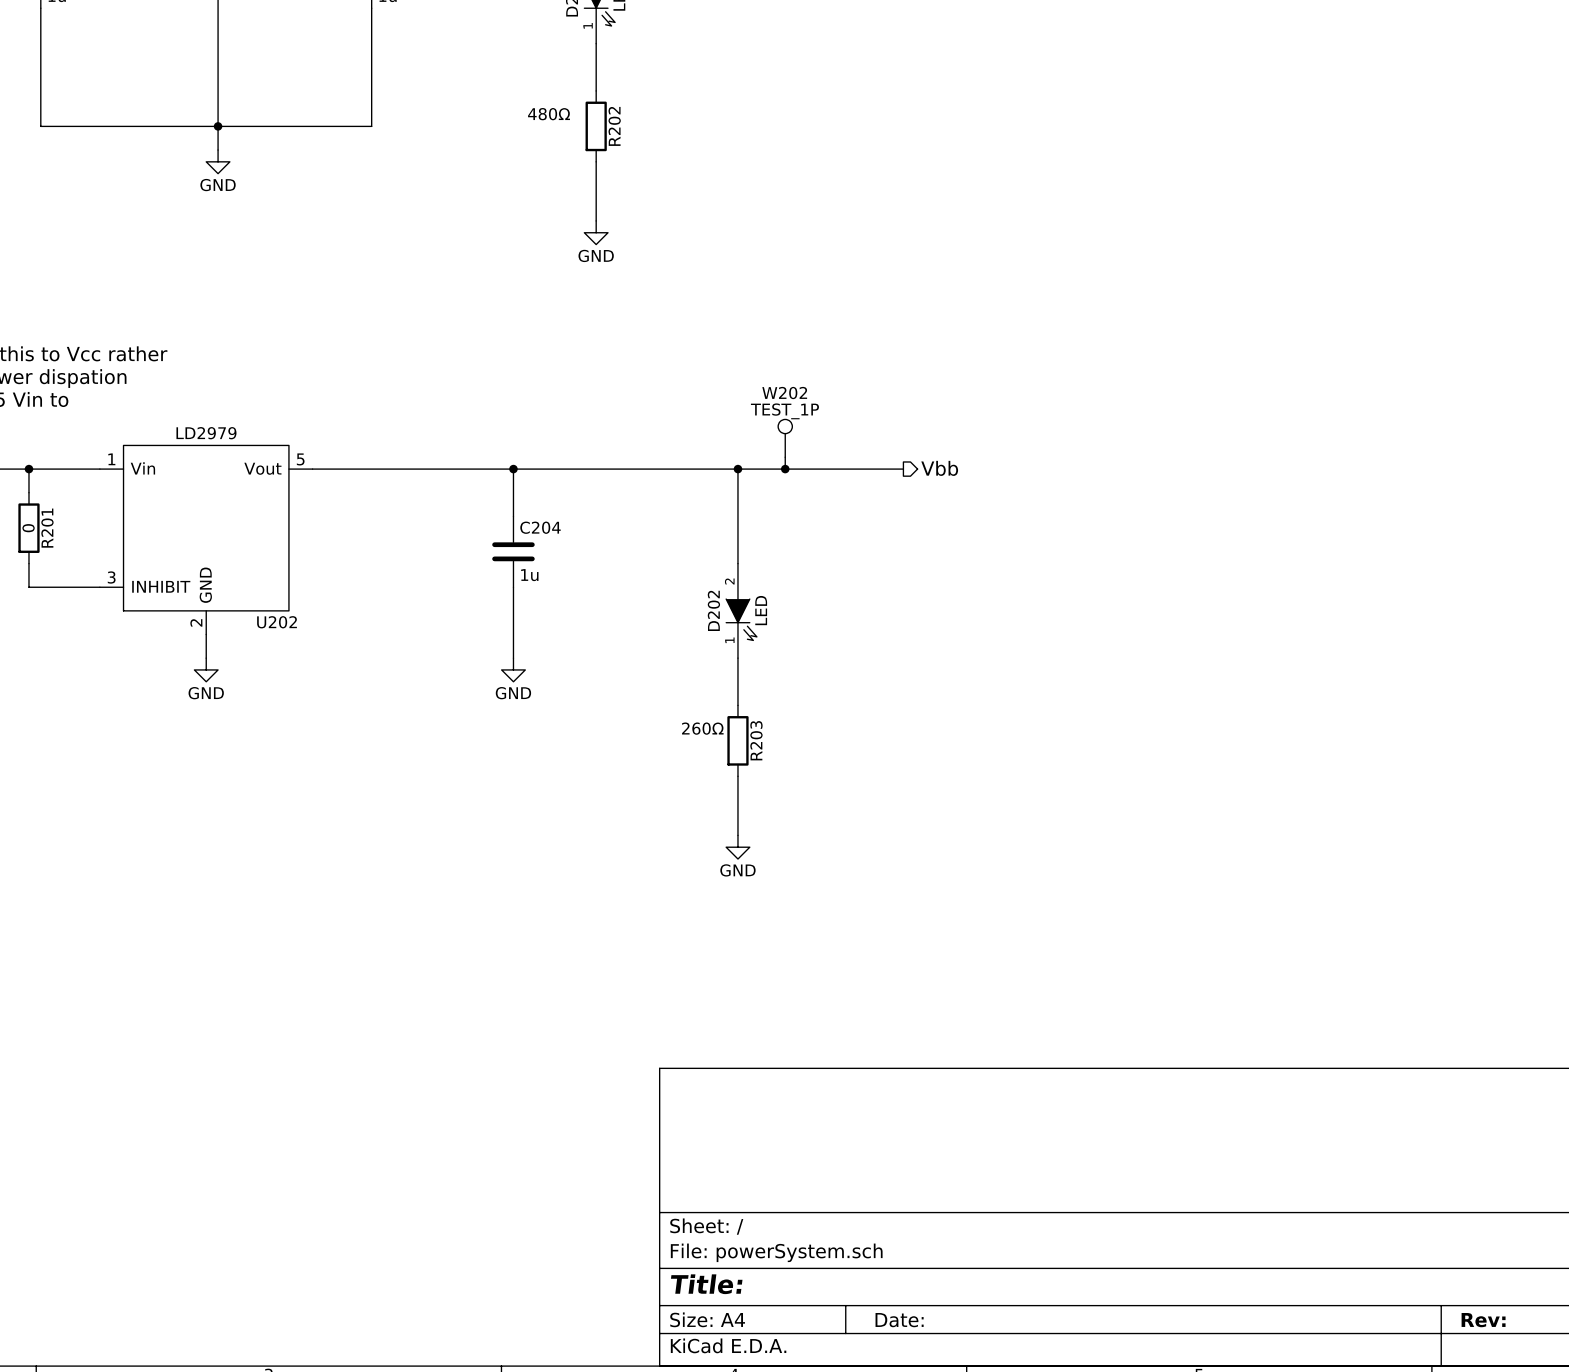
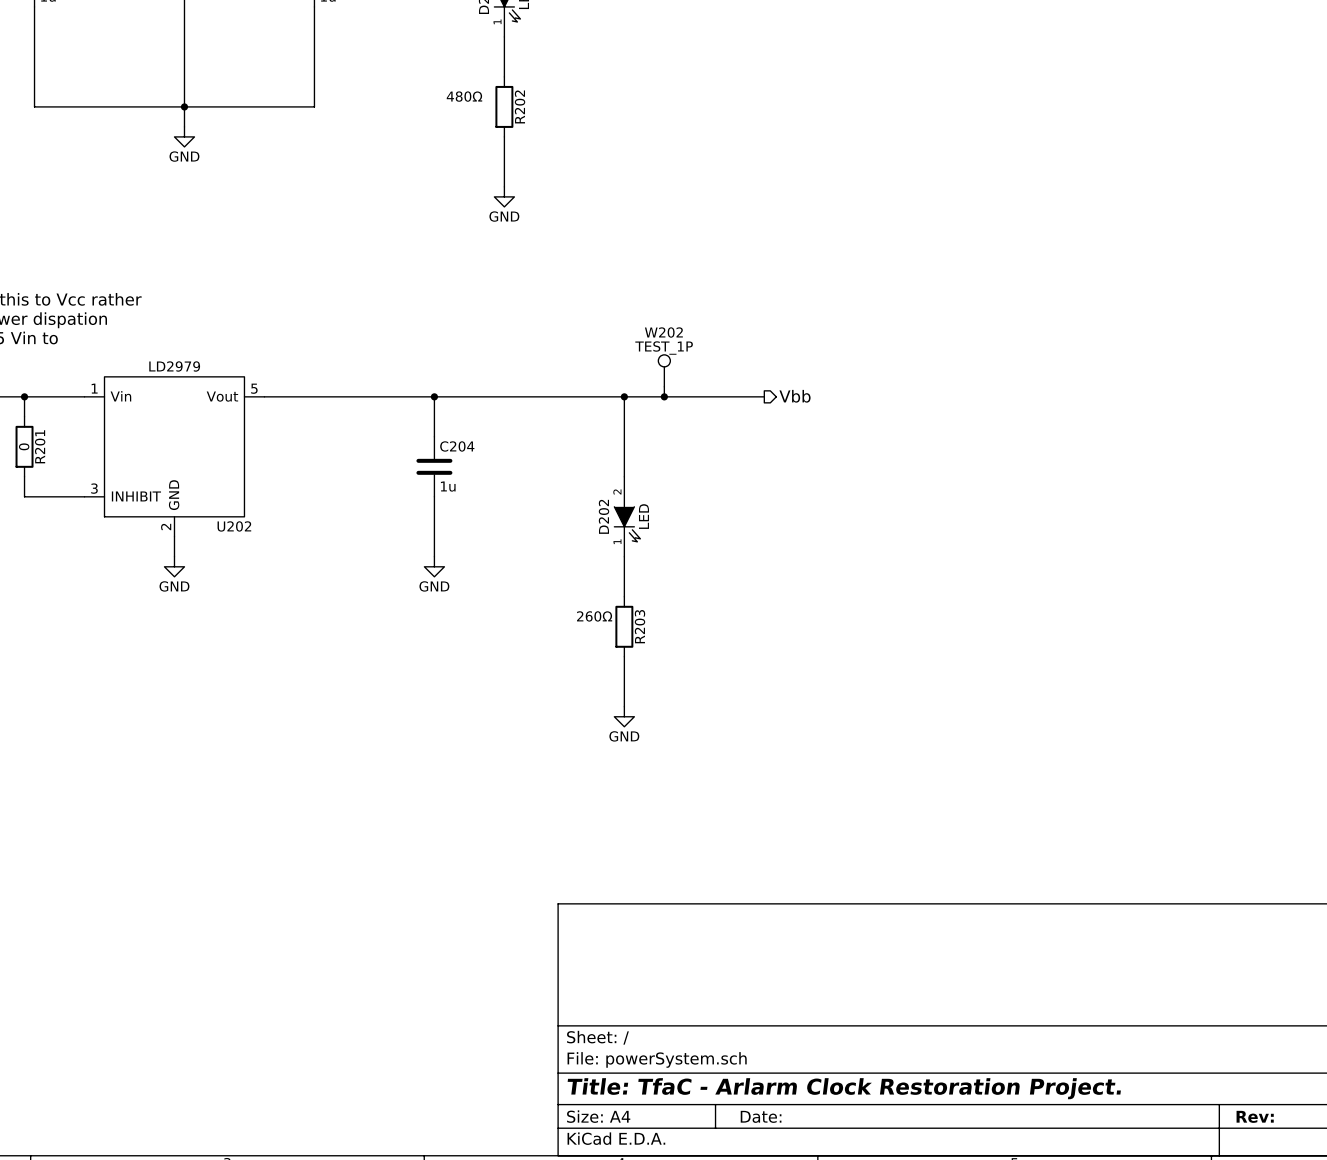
title block: Title: (706, 1284) -> Title: TfaC - Arlarm Clock Restoration Project. (844, 1088)

